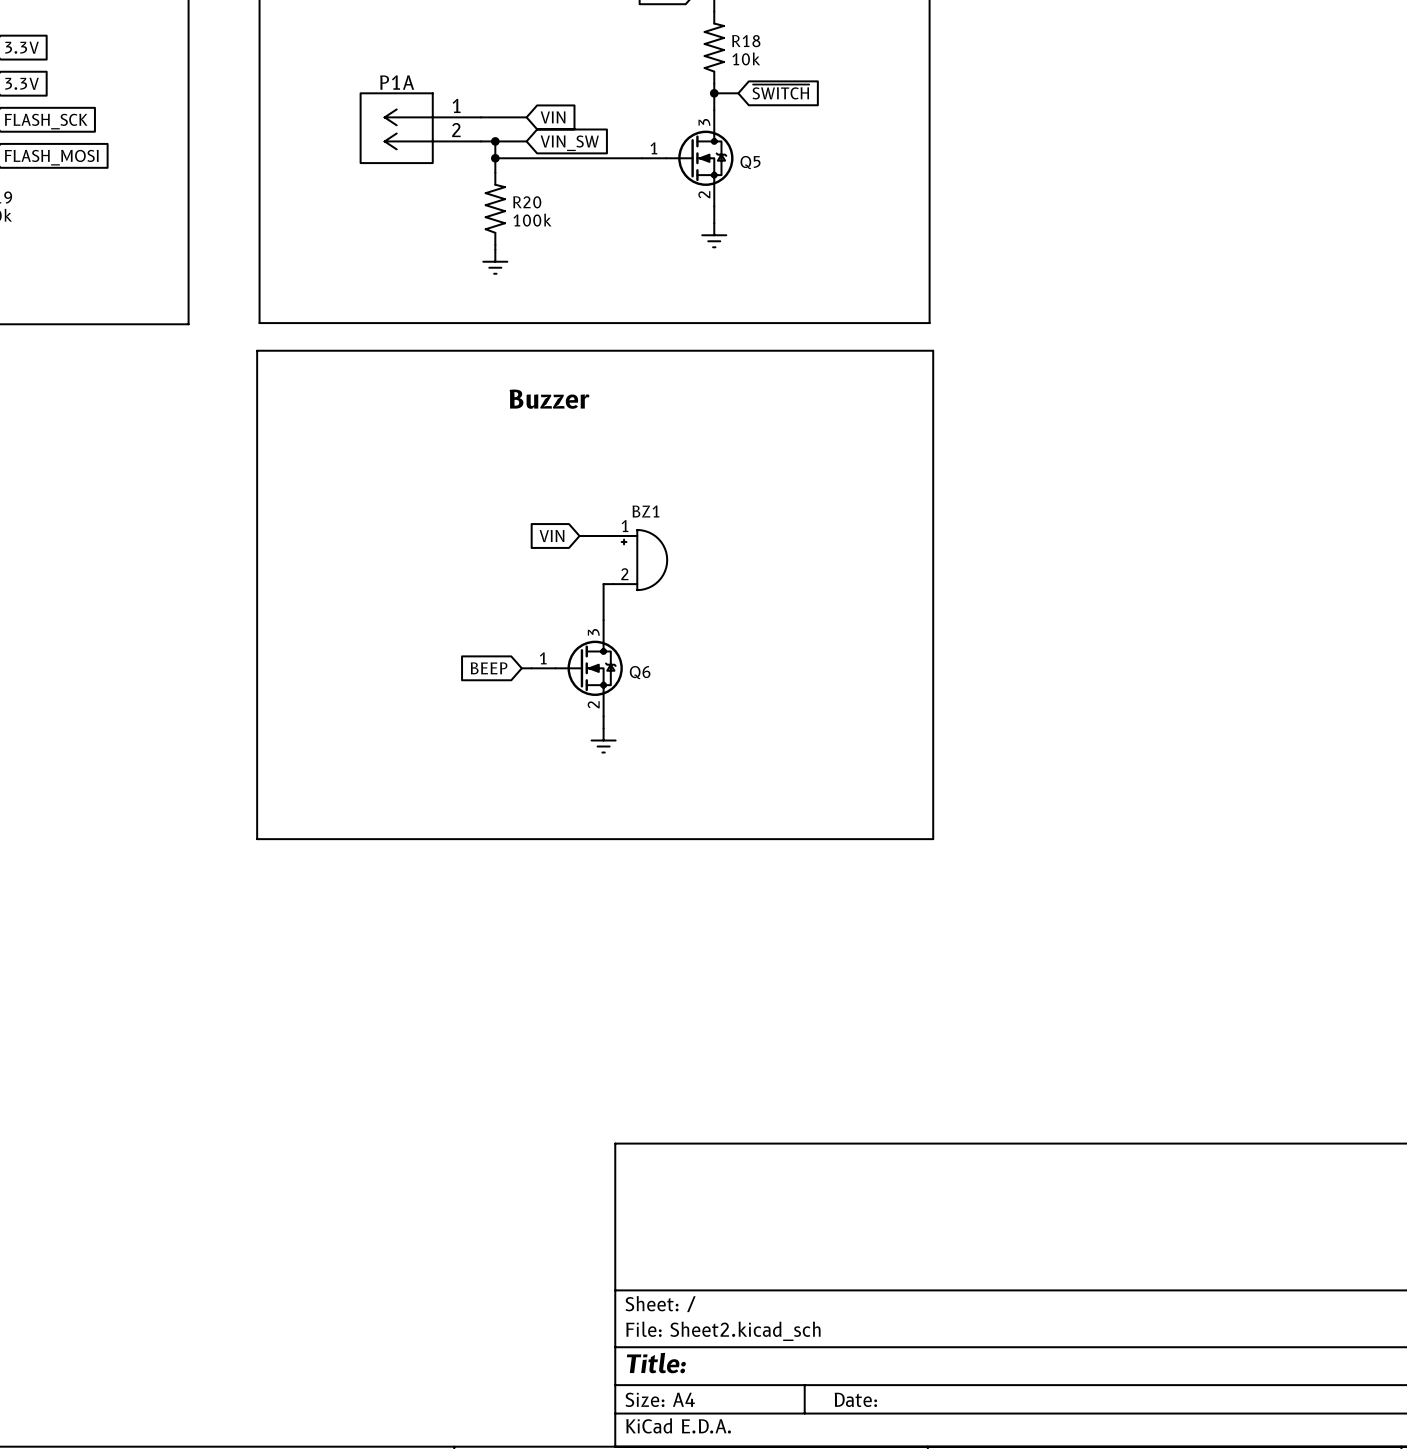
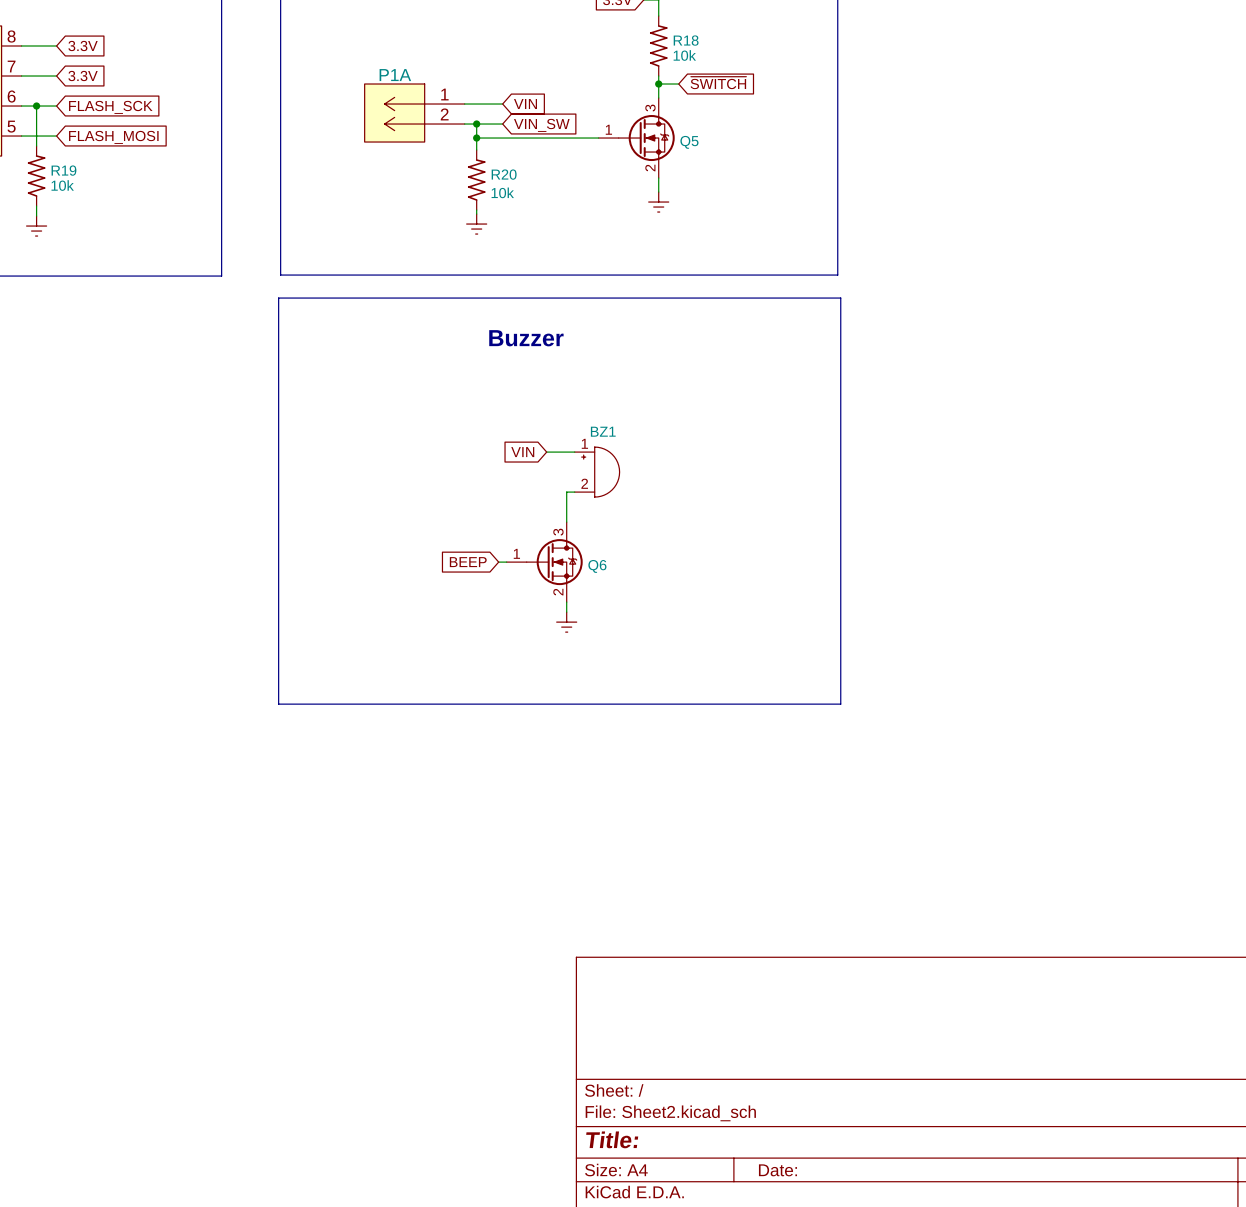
R20 value: 100k (532, 220) -> 10k (502, 192)

